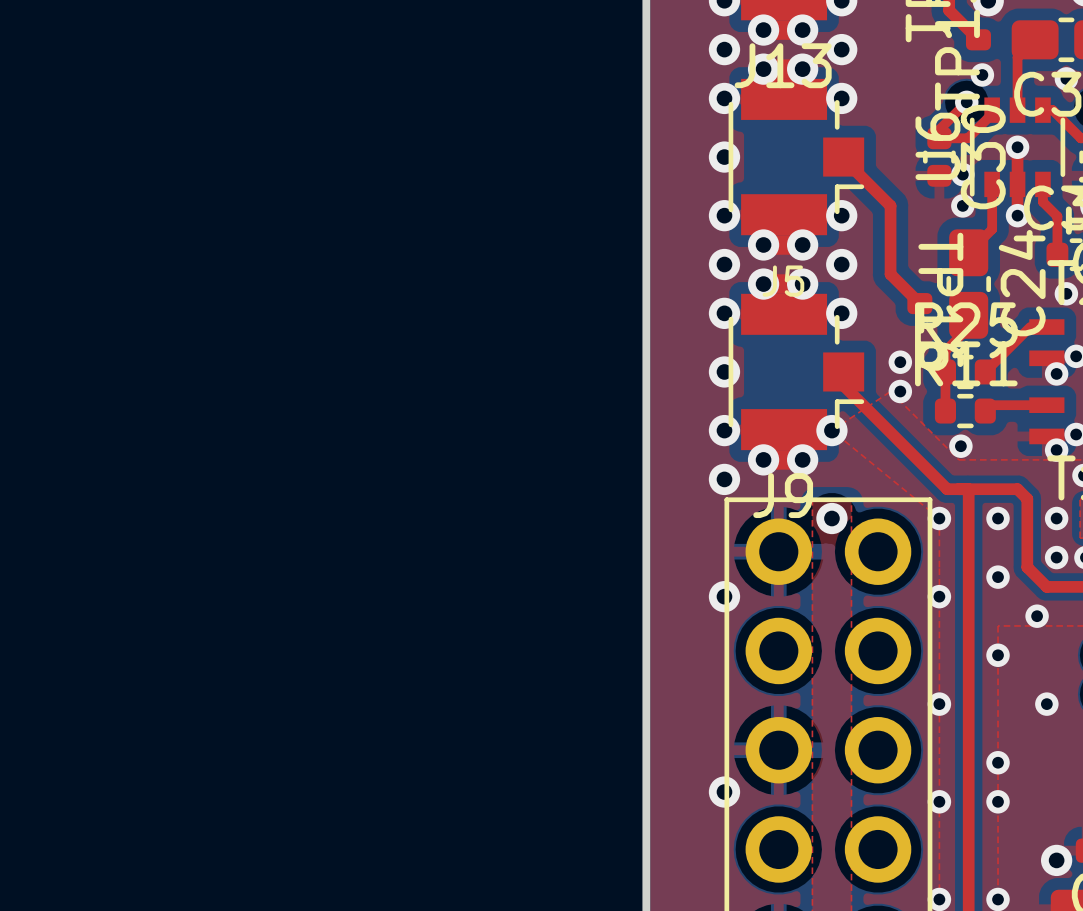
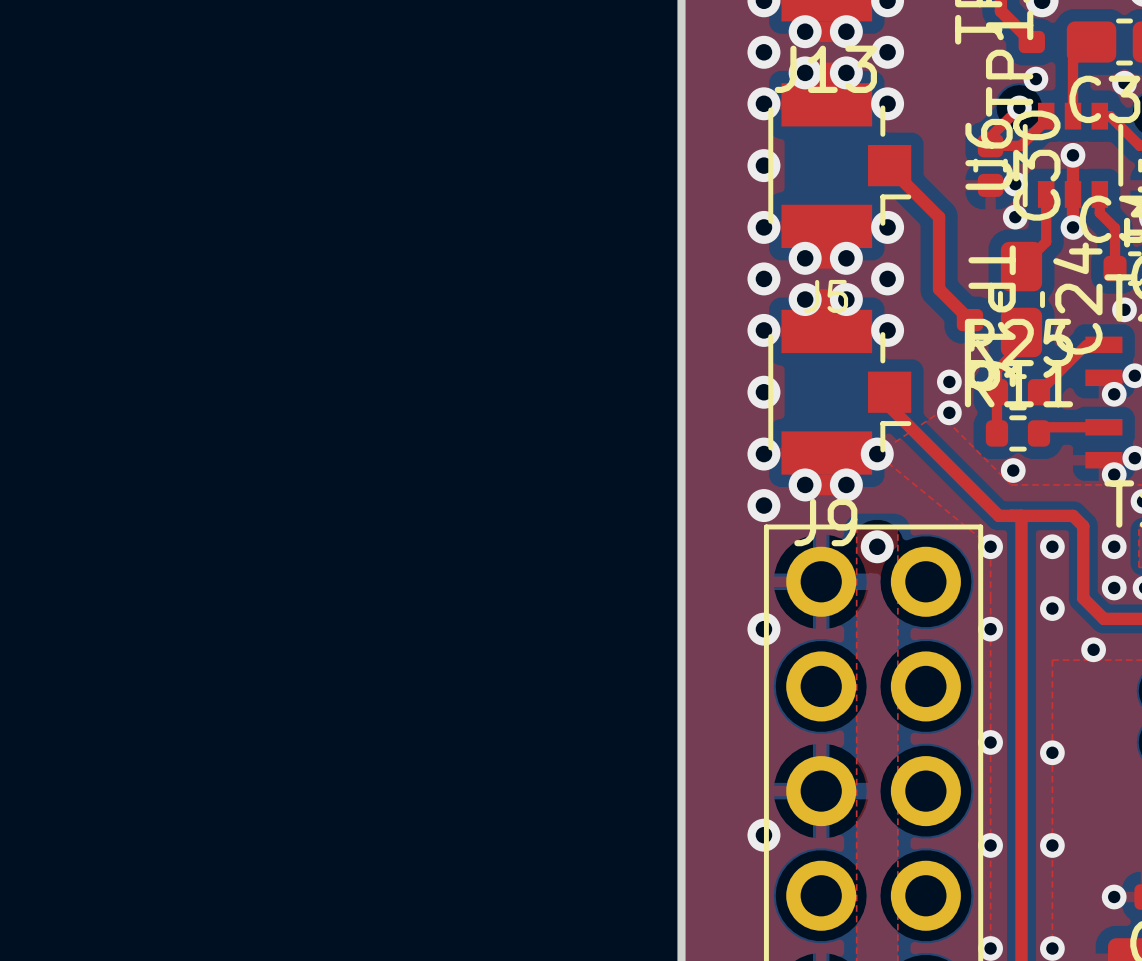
via: (998, 655) -> none
via: (1046, 704) -> none
via: none -> (1052, 752)
via: (998, 762) -> none
via size: [1040, 844, 1073, 877] -> [1101, 884, 1127, 910]

